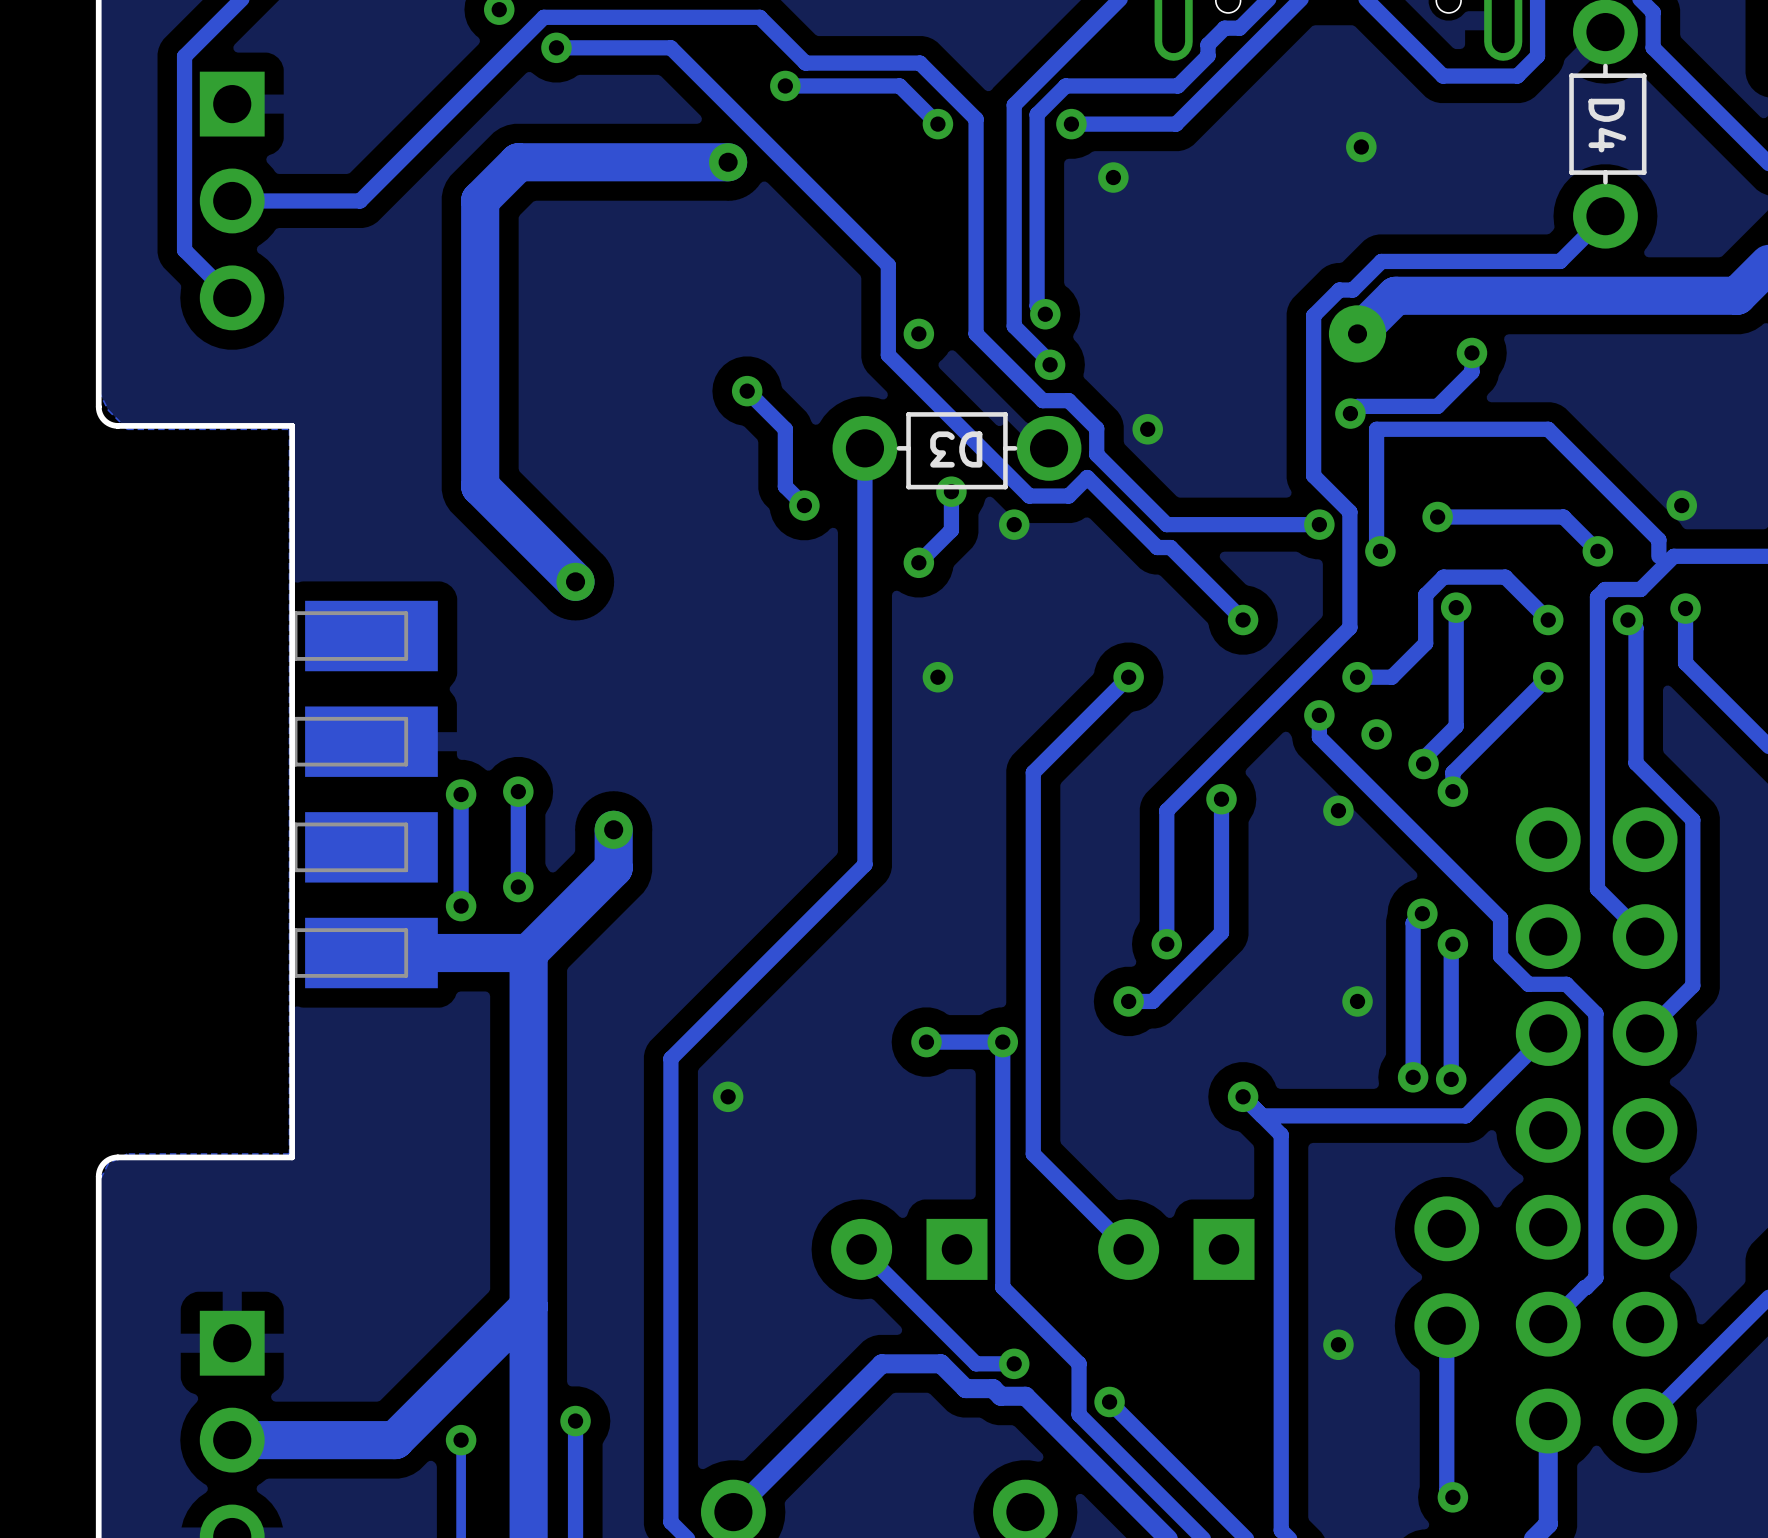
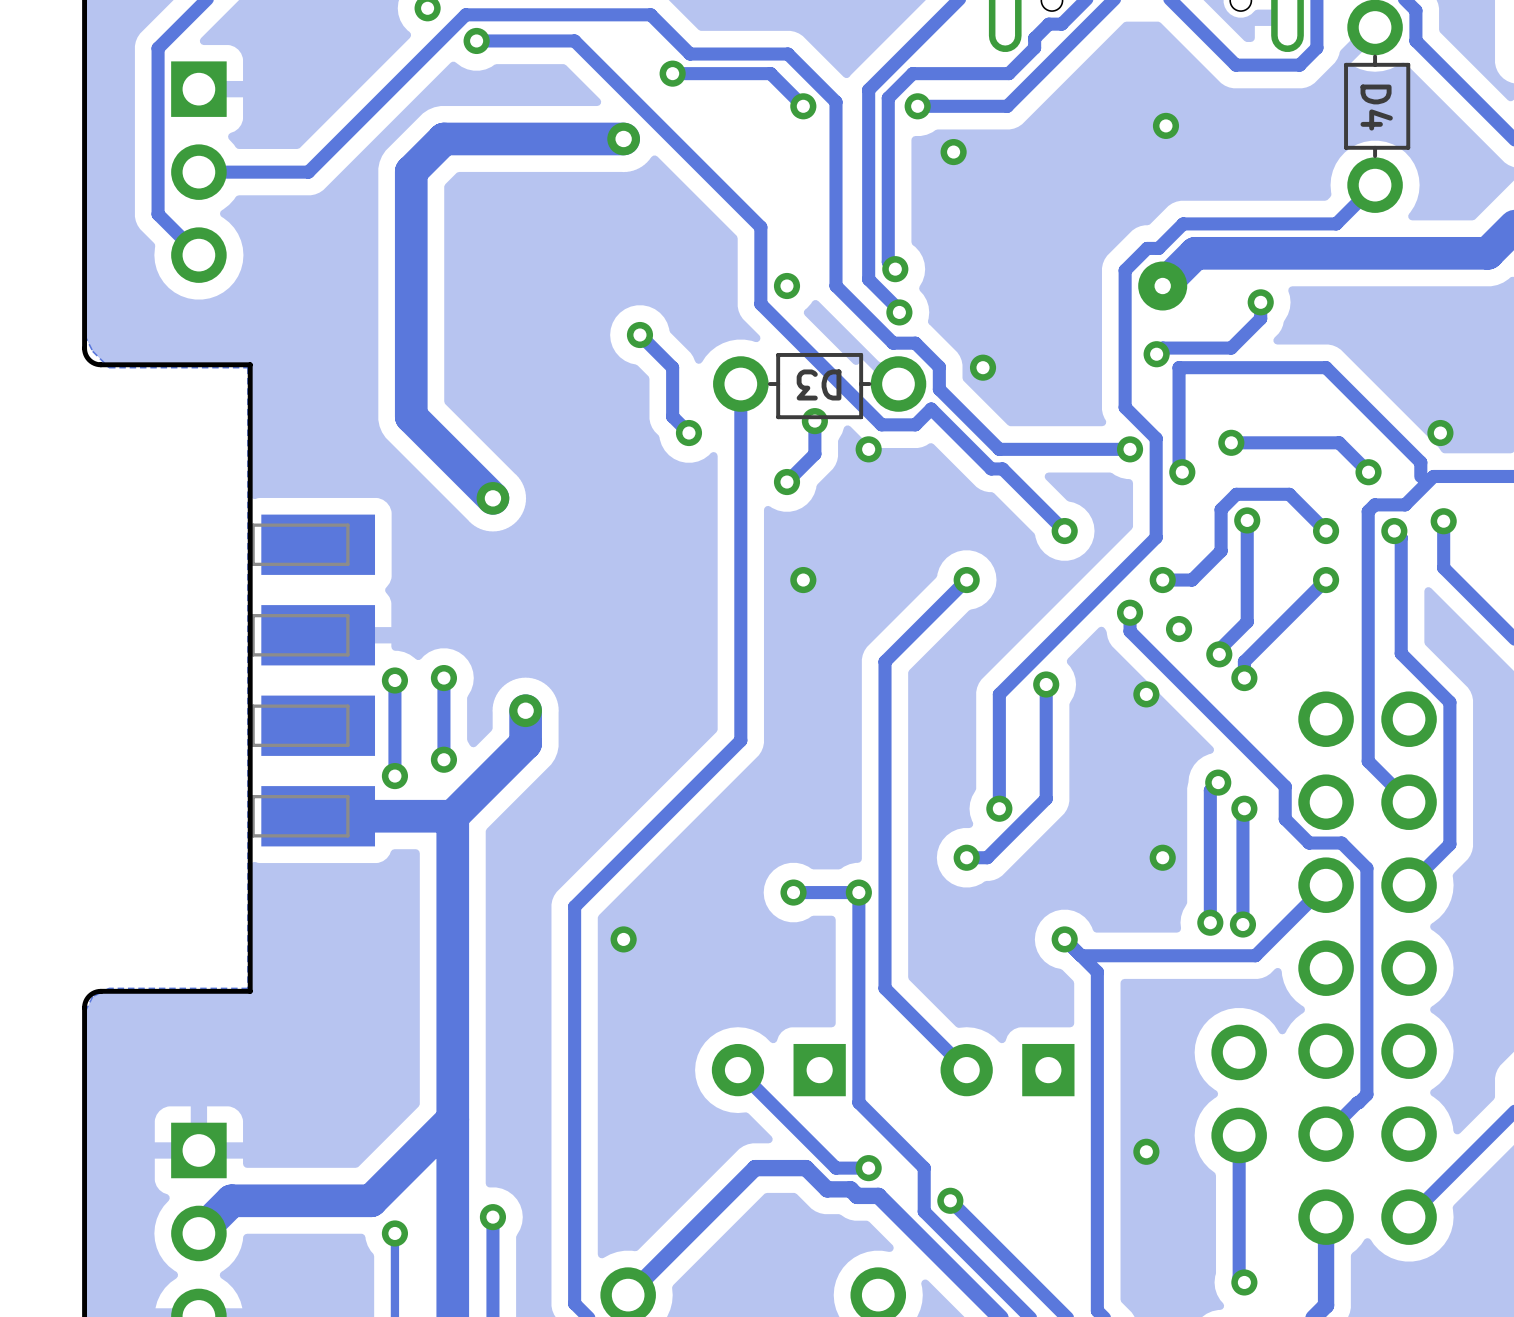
track: (433, 1401) (395, 1440) (232, 1440) -> (371, 1200) (231, 1200) (198, 1233)

